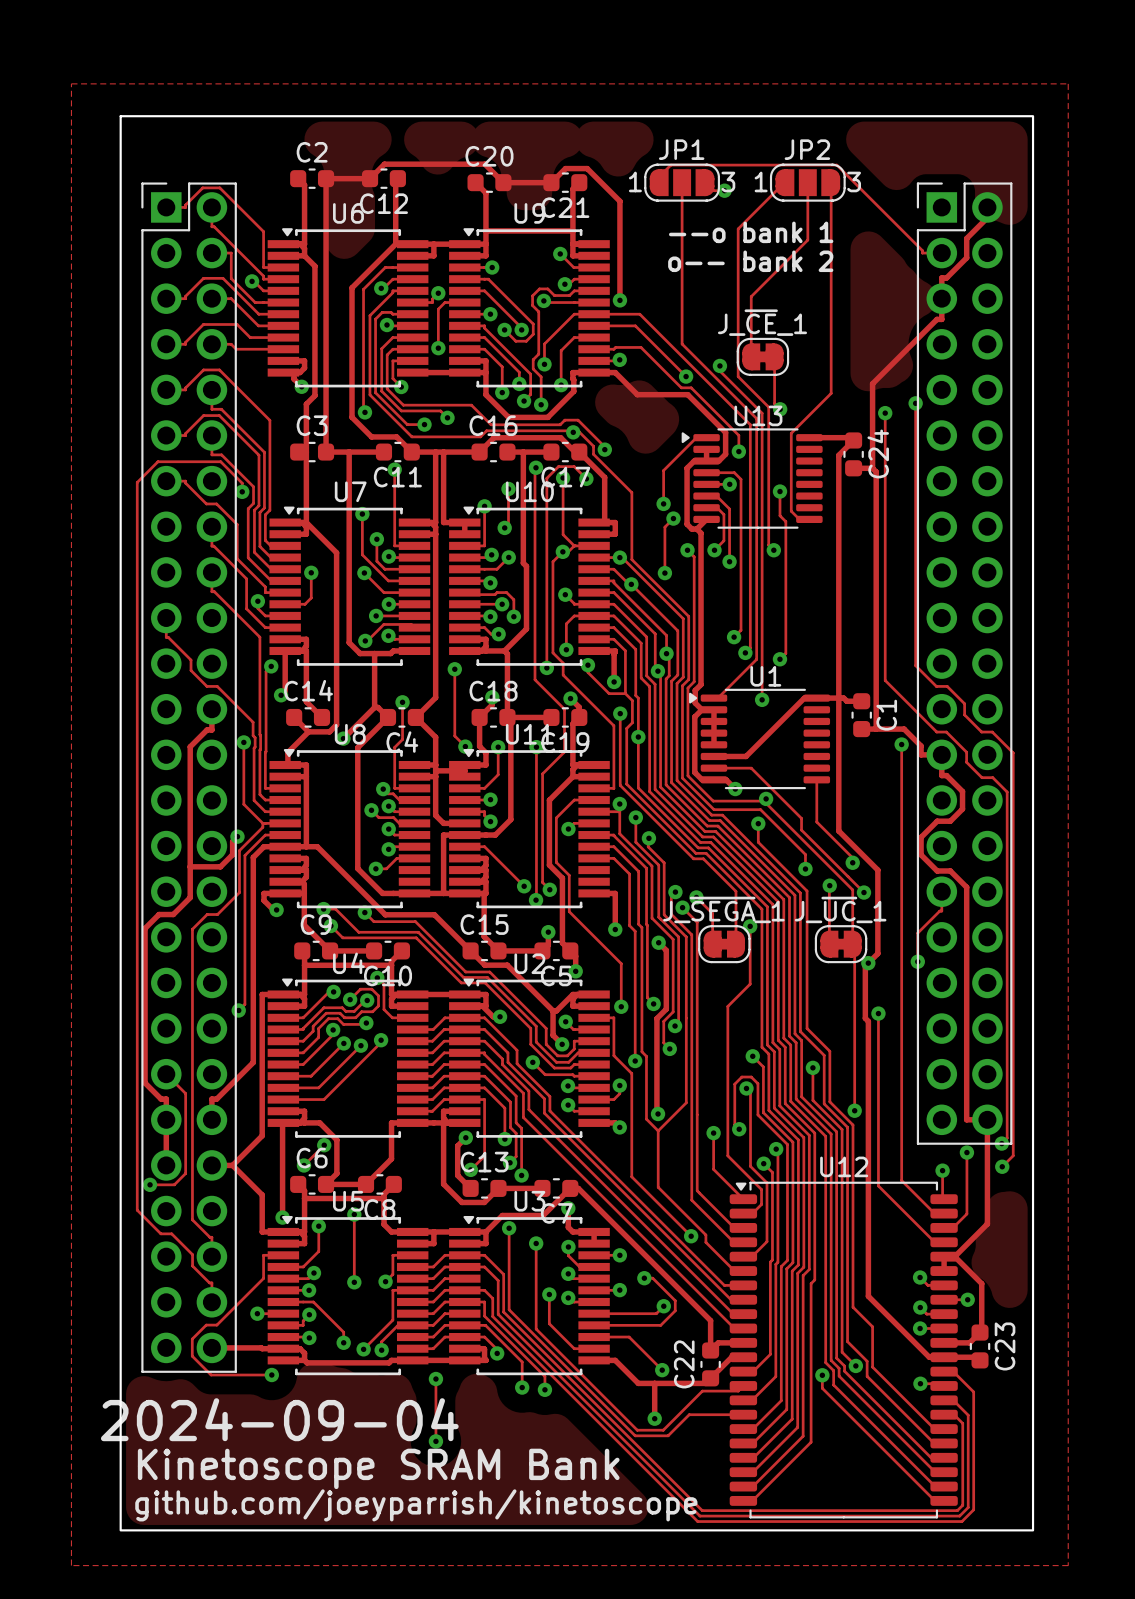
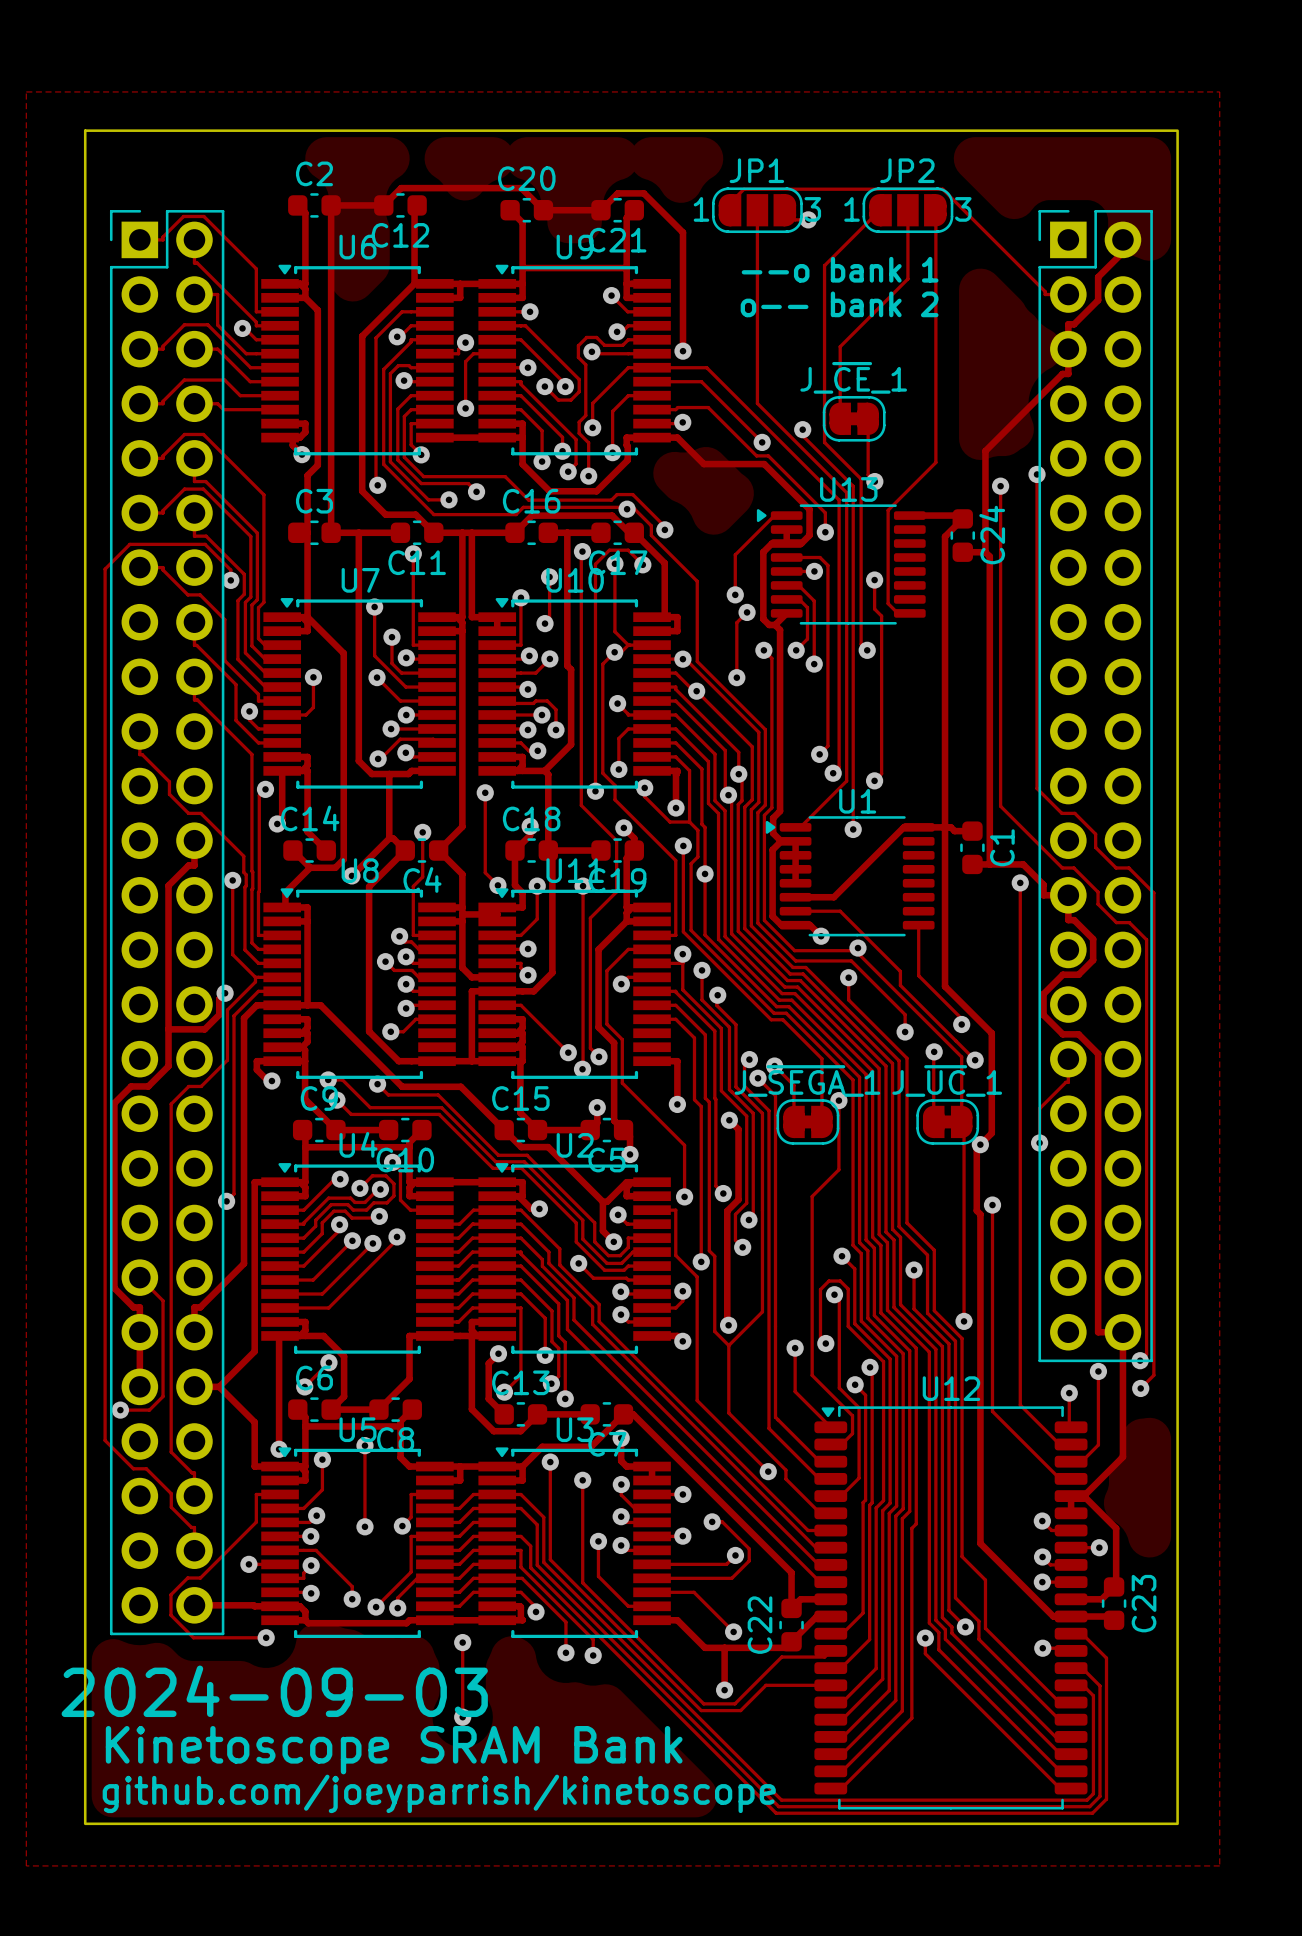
text: 2024-09-04 (279, 1419) -> 2024-09-03 (274, 1691)

